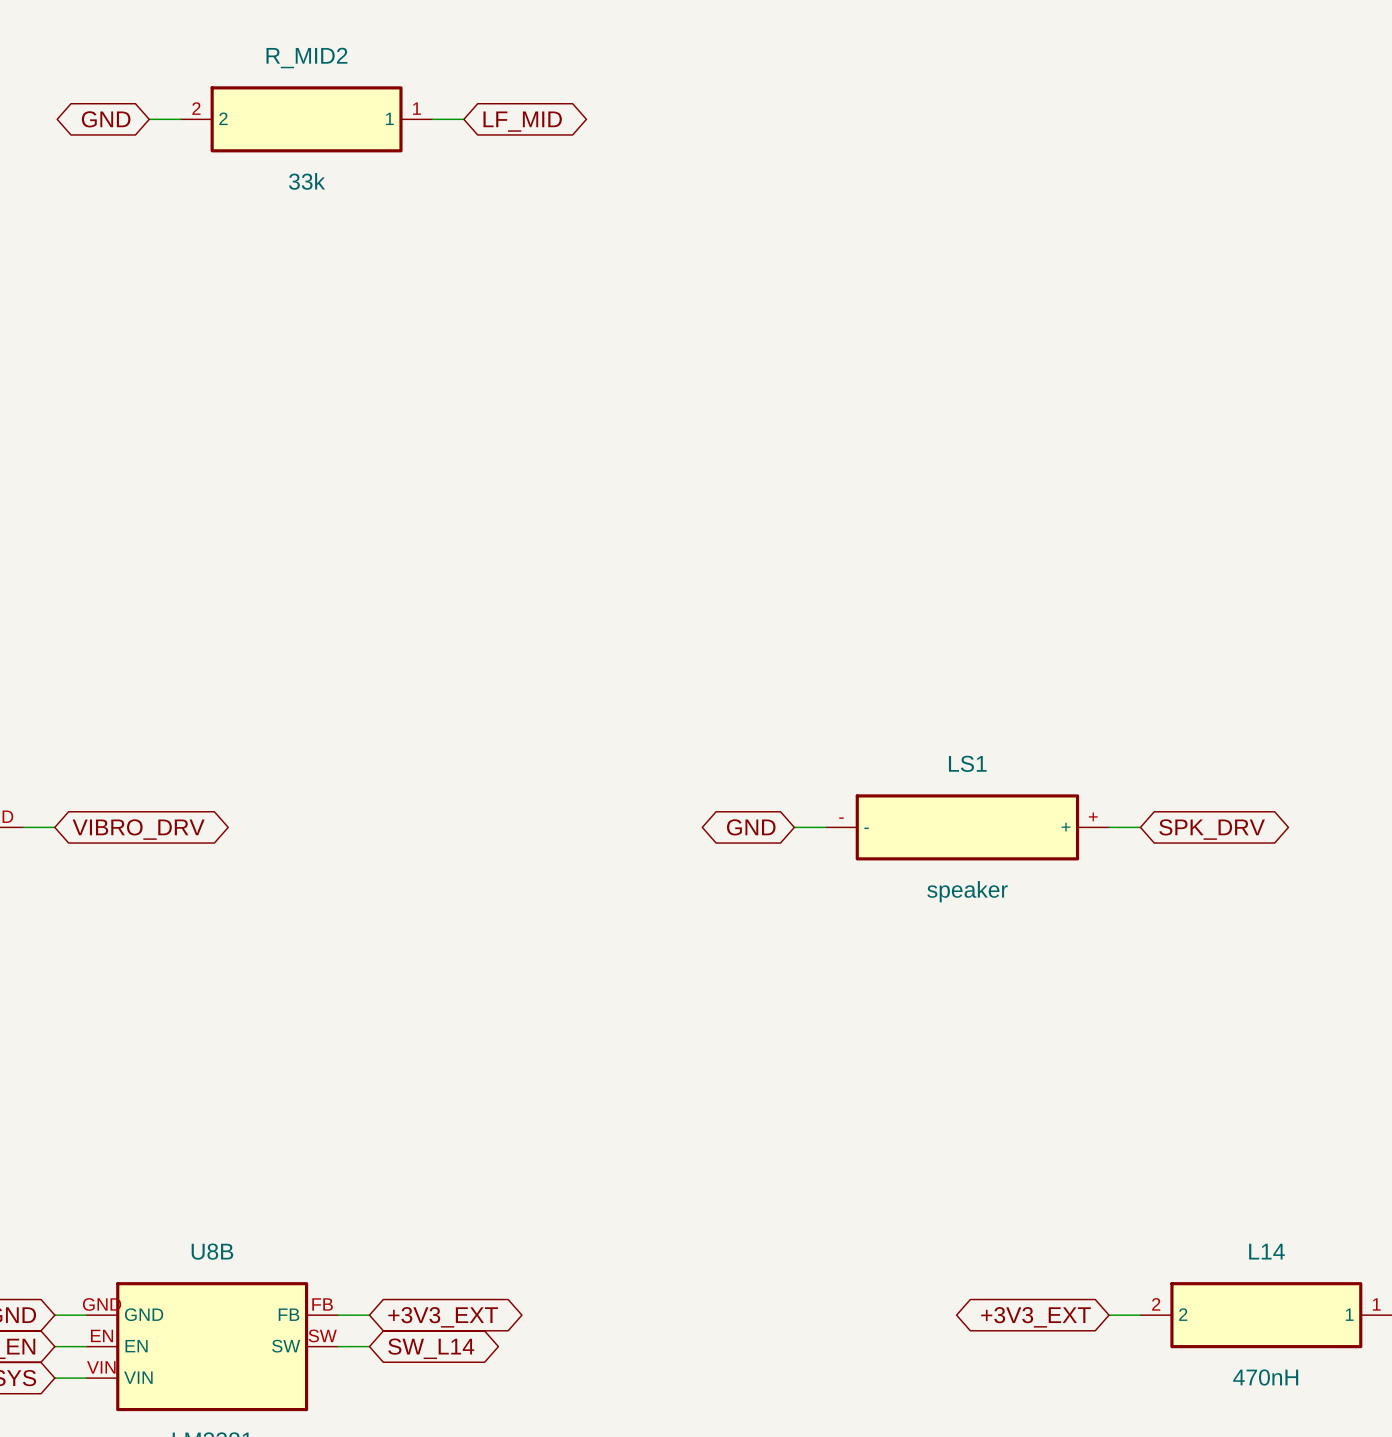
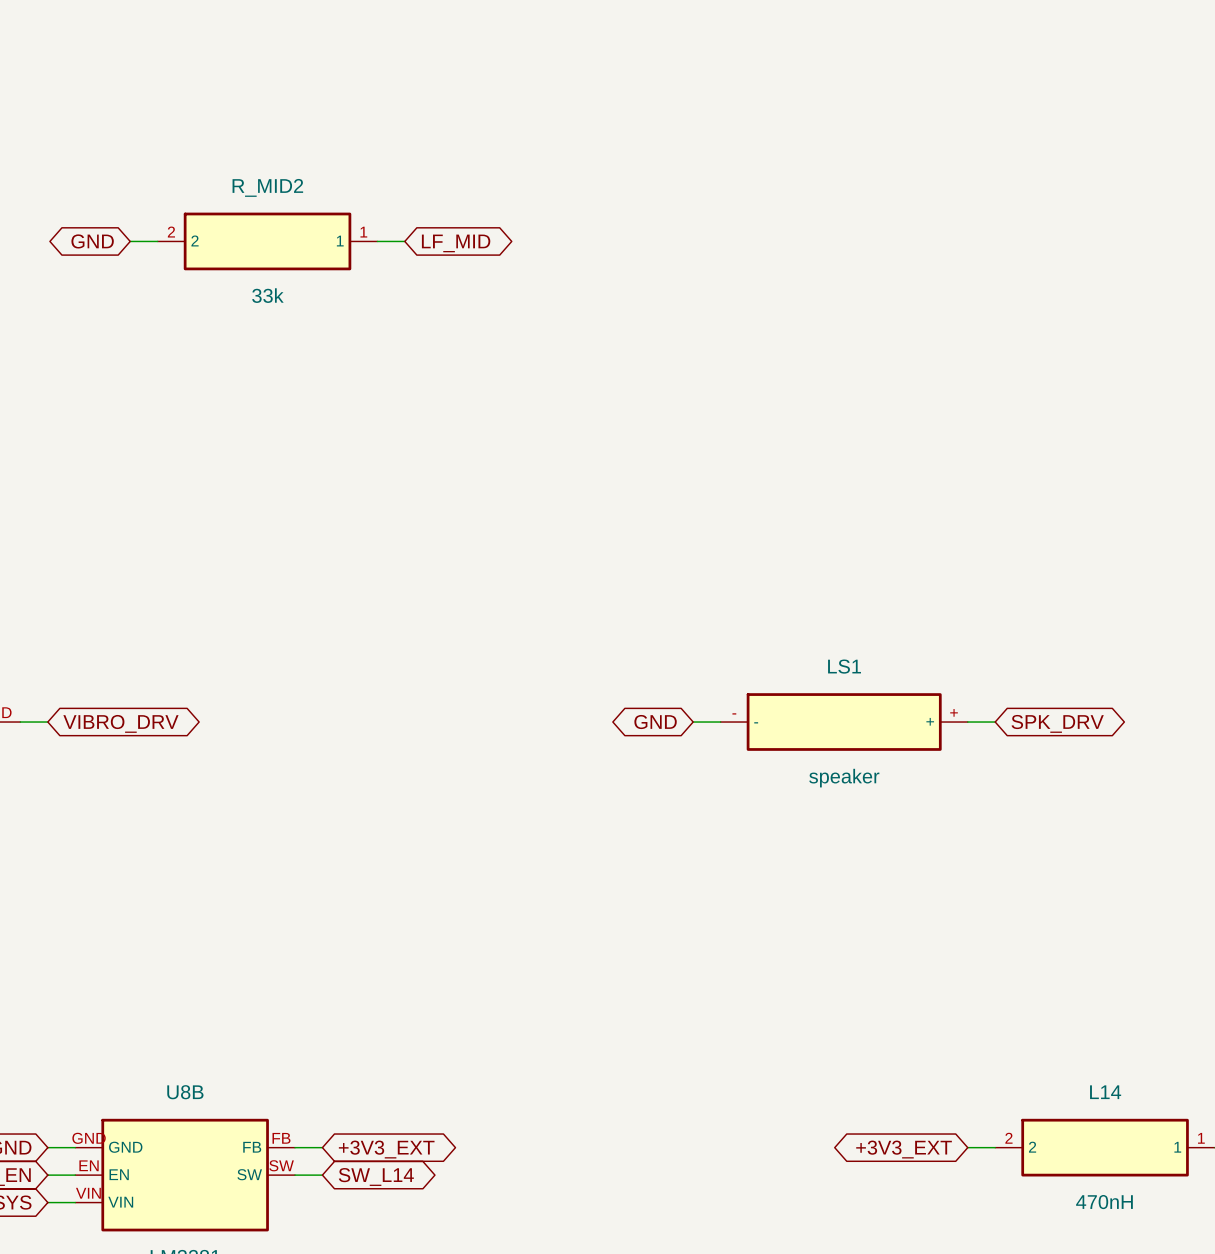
global label position: GND (106, 119) -> GND (92, 241)
wire: (149, 119) (180, 119) -> (130, 241) (157, 241)
R_MID2 position: (306, 119) -> (267, 241)
wire: (432, 119) (463, 119) -> (377, 241) (404, 241)
global label position: LF_MID (522, 121) -> LF_MID (456, 243)

